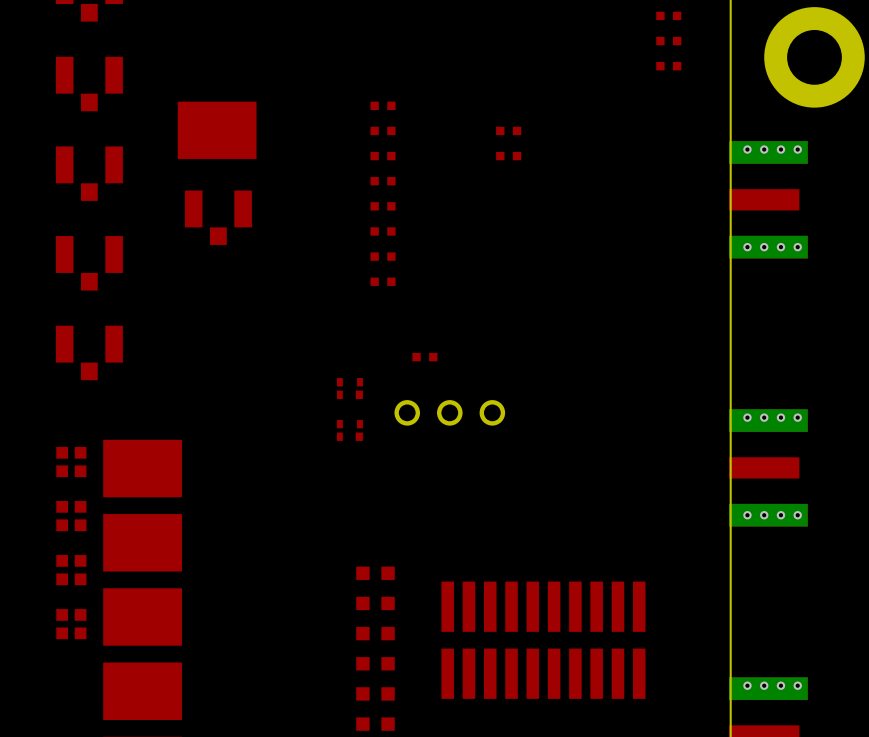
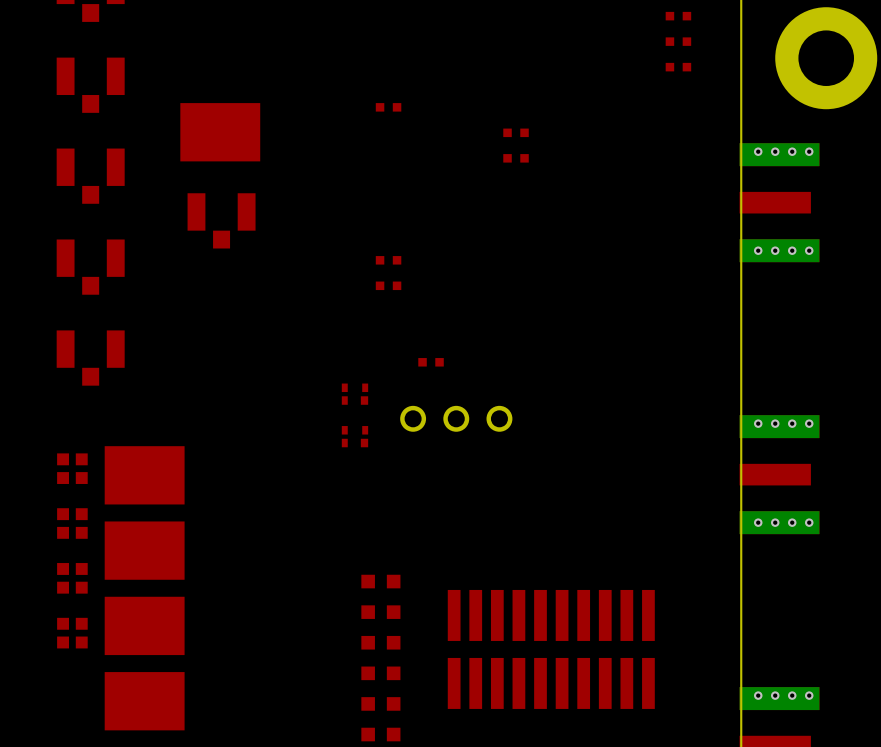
part: (383, 130) -> none
part: (383, 156) -> none
part: (383, 181) -> none
part: (383, 206) -> none
part: (383, 231) -> none

